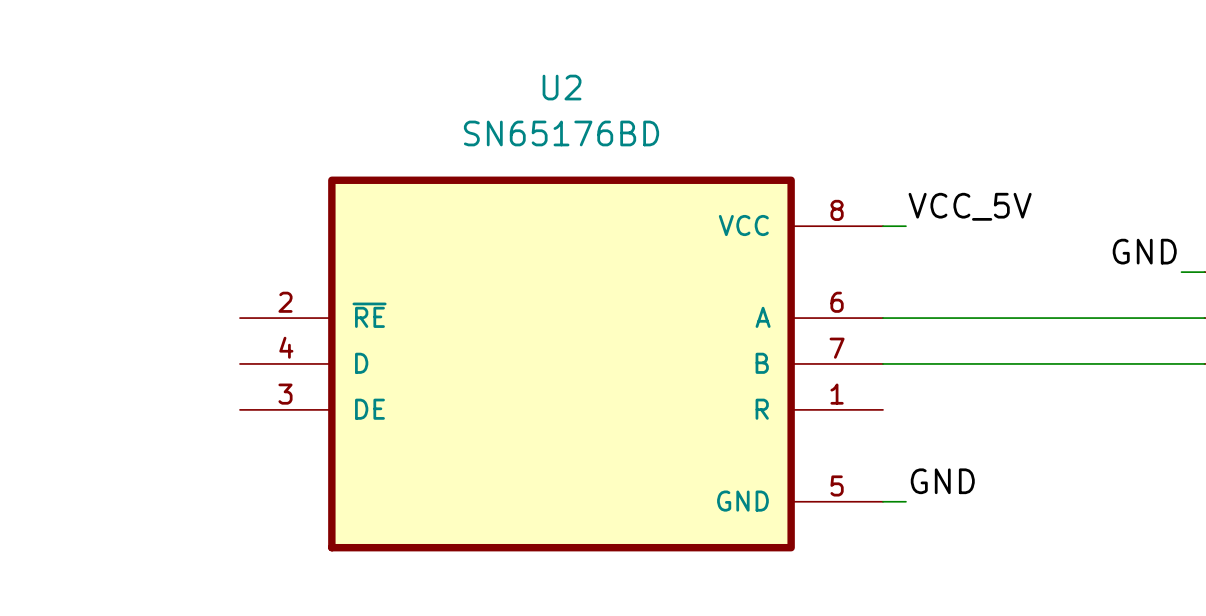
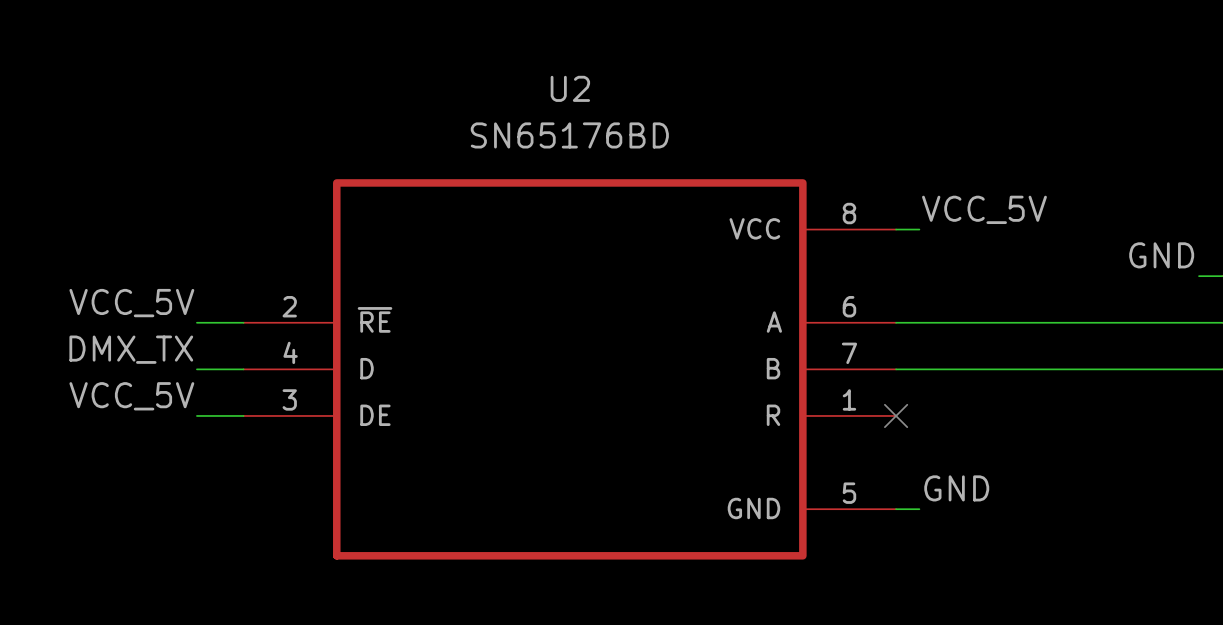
label: none -> VCC_5V (131, 303)
wire: none -> (196, 322) (243, 322)
label: none -> DMX_TX (131, 349)
wire: none -> (196, 369) (243, 369)
label: none -> VCC_5V (131, 396)
wire: none -> (196, 415) (243, 415)
no-connect mark: none -> (896, 415)

